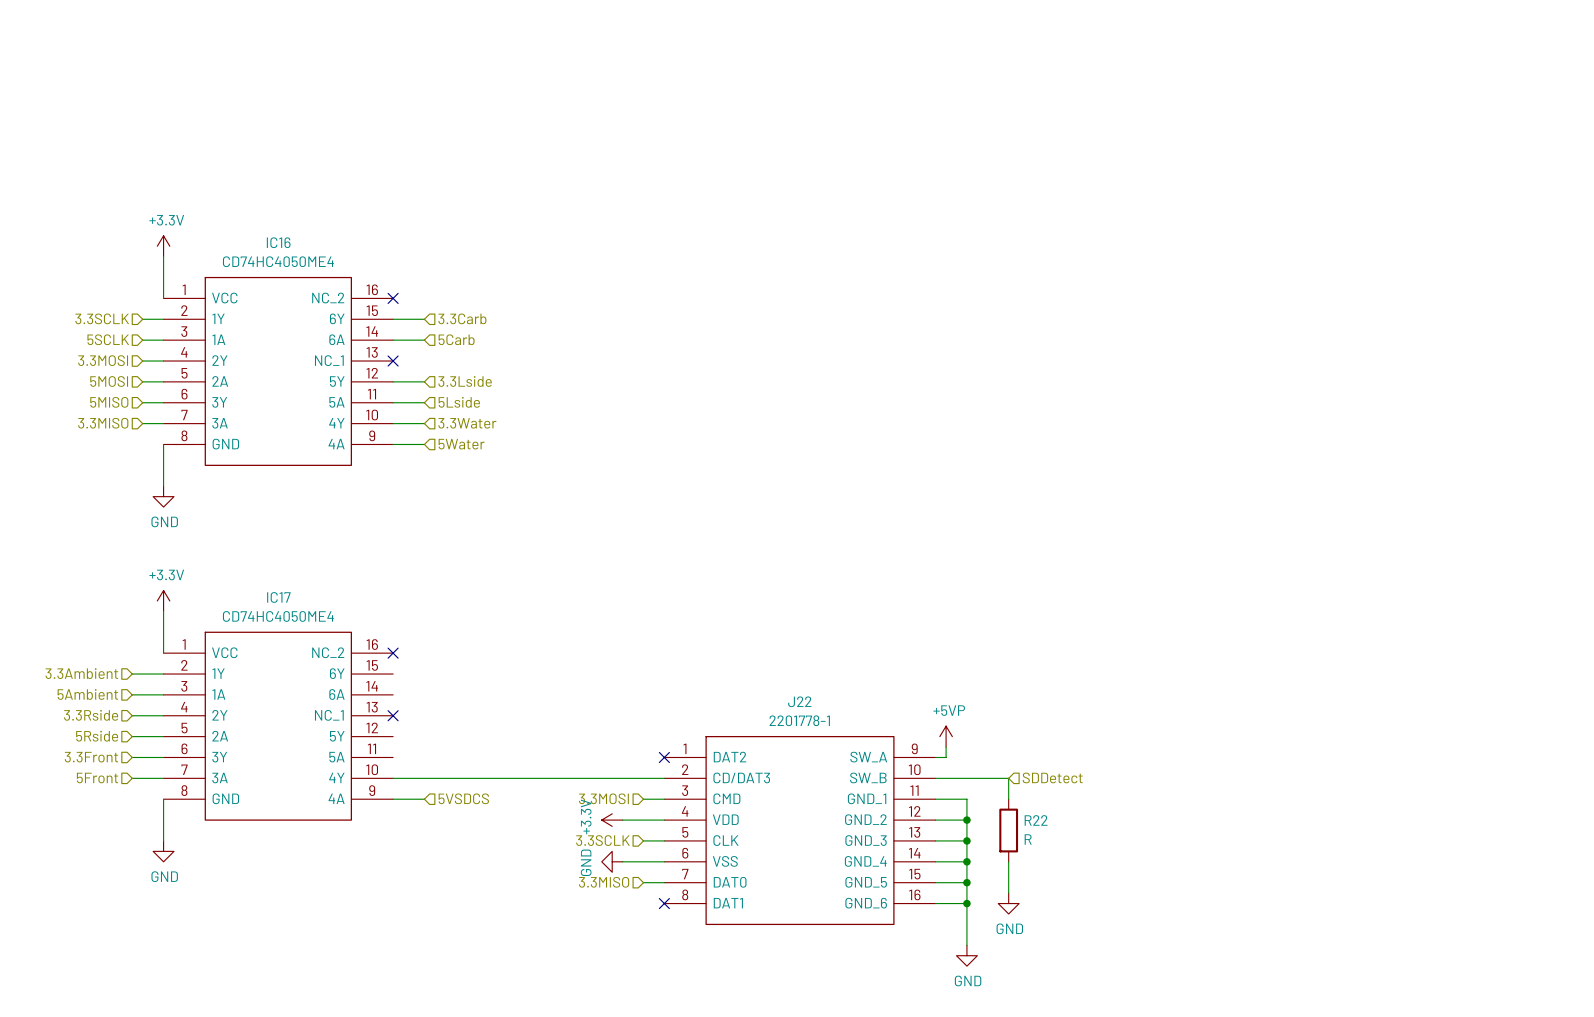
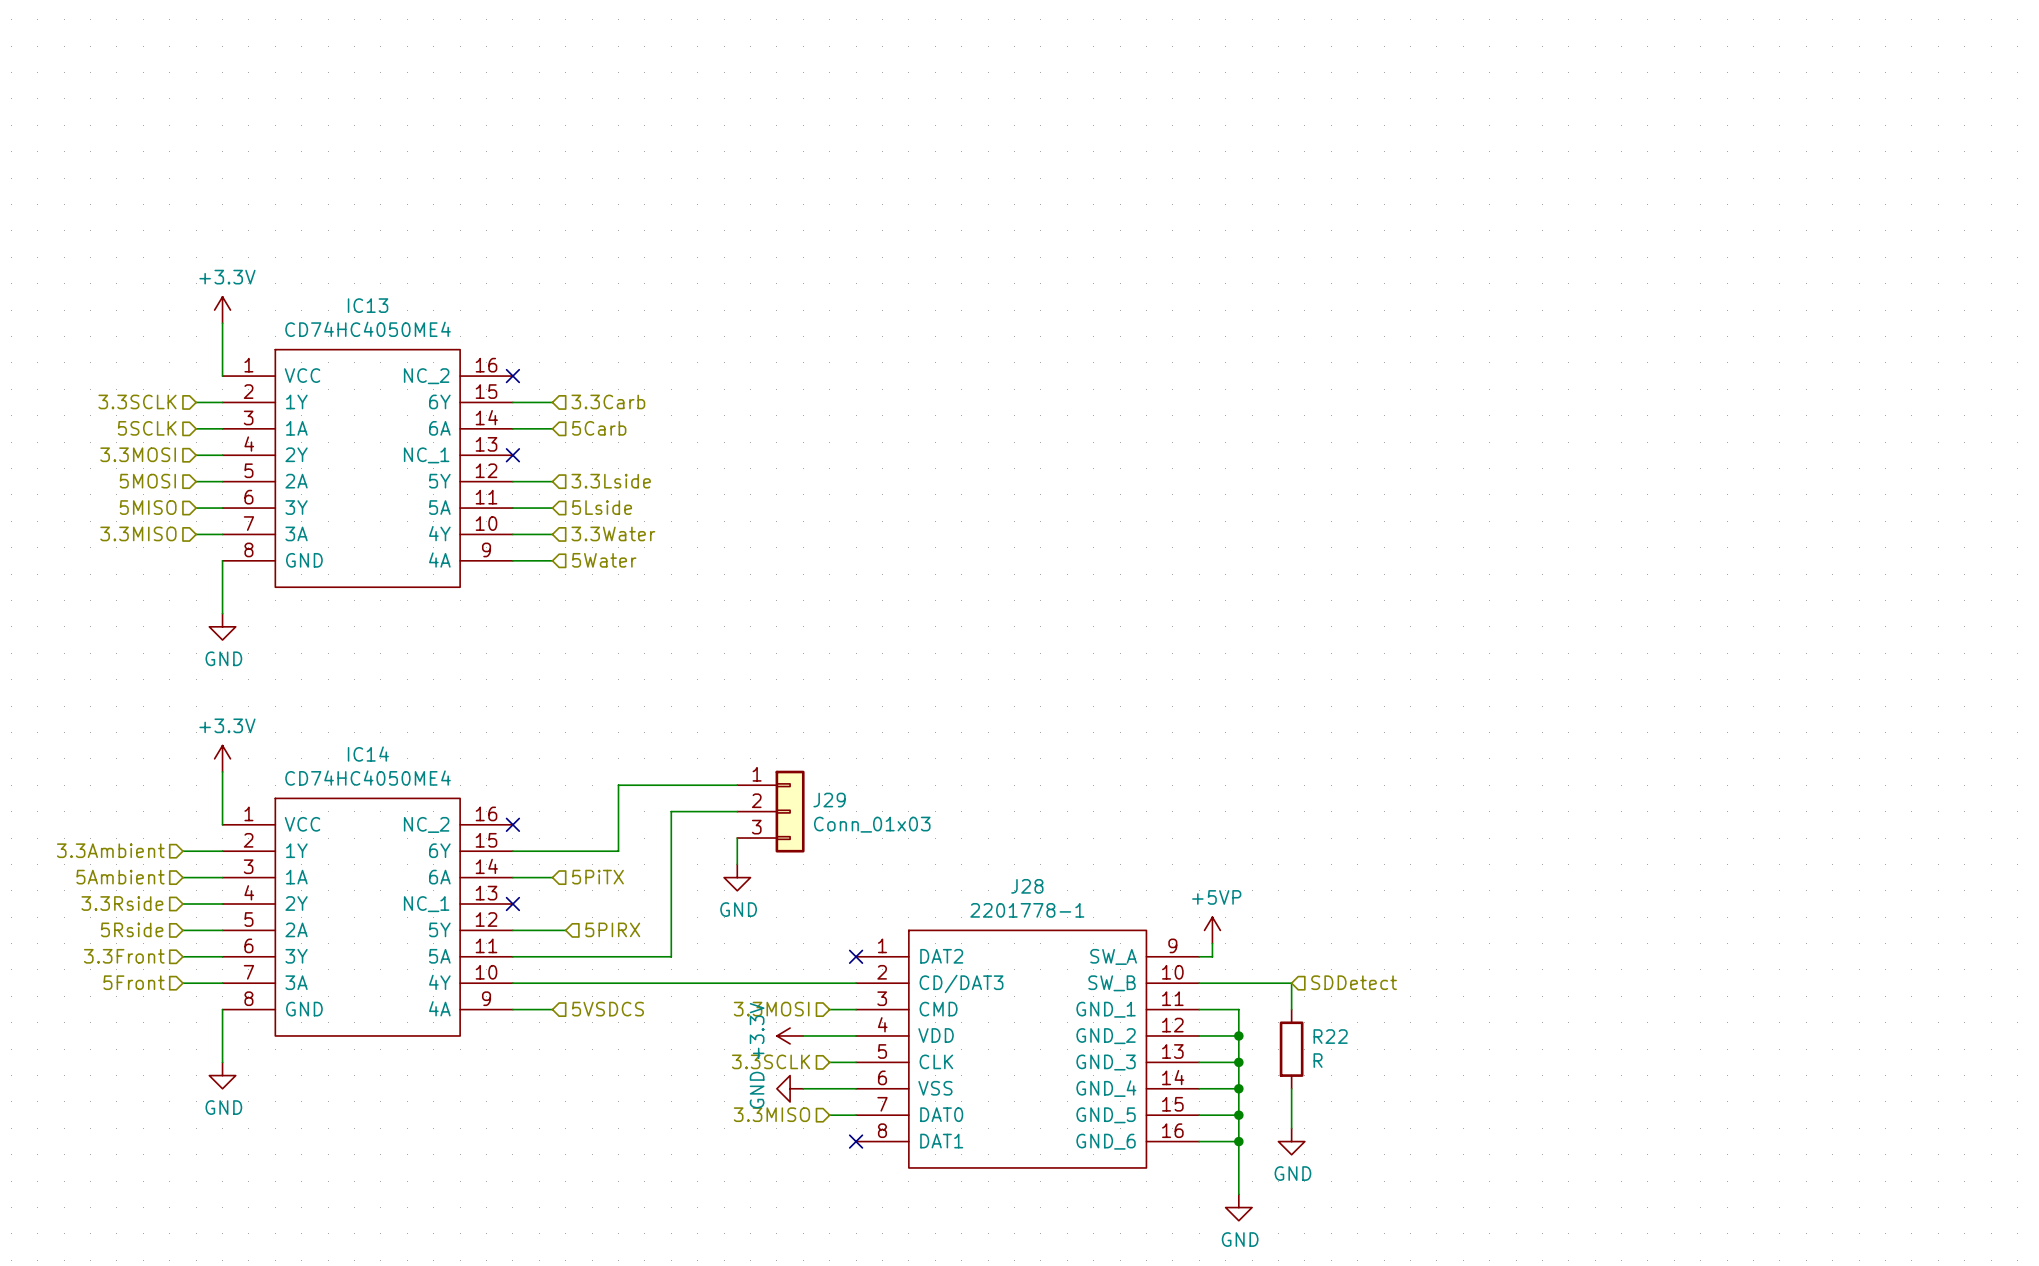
IC16 name: IC16 (278, 242) -> IC13 (368, 305)
IC17 name: IC17 (278, 597) -> IC14 (368, 754)
wire: none -> (737, 785) (618, 785) (618, 851) (512, 851)
wire: none -> (737, 811) (671, 811) (671, 956) (512, 956)
J29: none -> Conn_01x03 (770, 811)
wire: none -> (737, 838) (737, 864)
wire: none -> (512, 877) (552, 877)
hierarchical label: none -> 5PiTX (597, 877)
power symbol: none -> GND (737, 877)
J22 name: J22 (799, 701) -> J28 (1027, 886)
wire: none -> (512, 930) (565, 930)
hierarchical label: none -> 5PIRX (612, 929)

